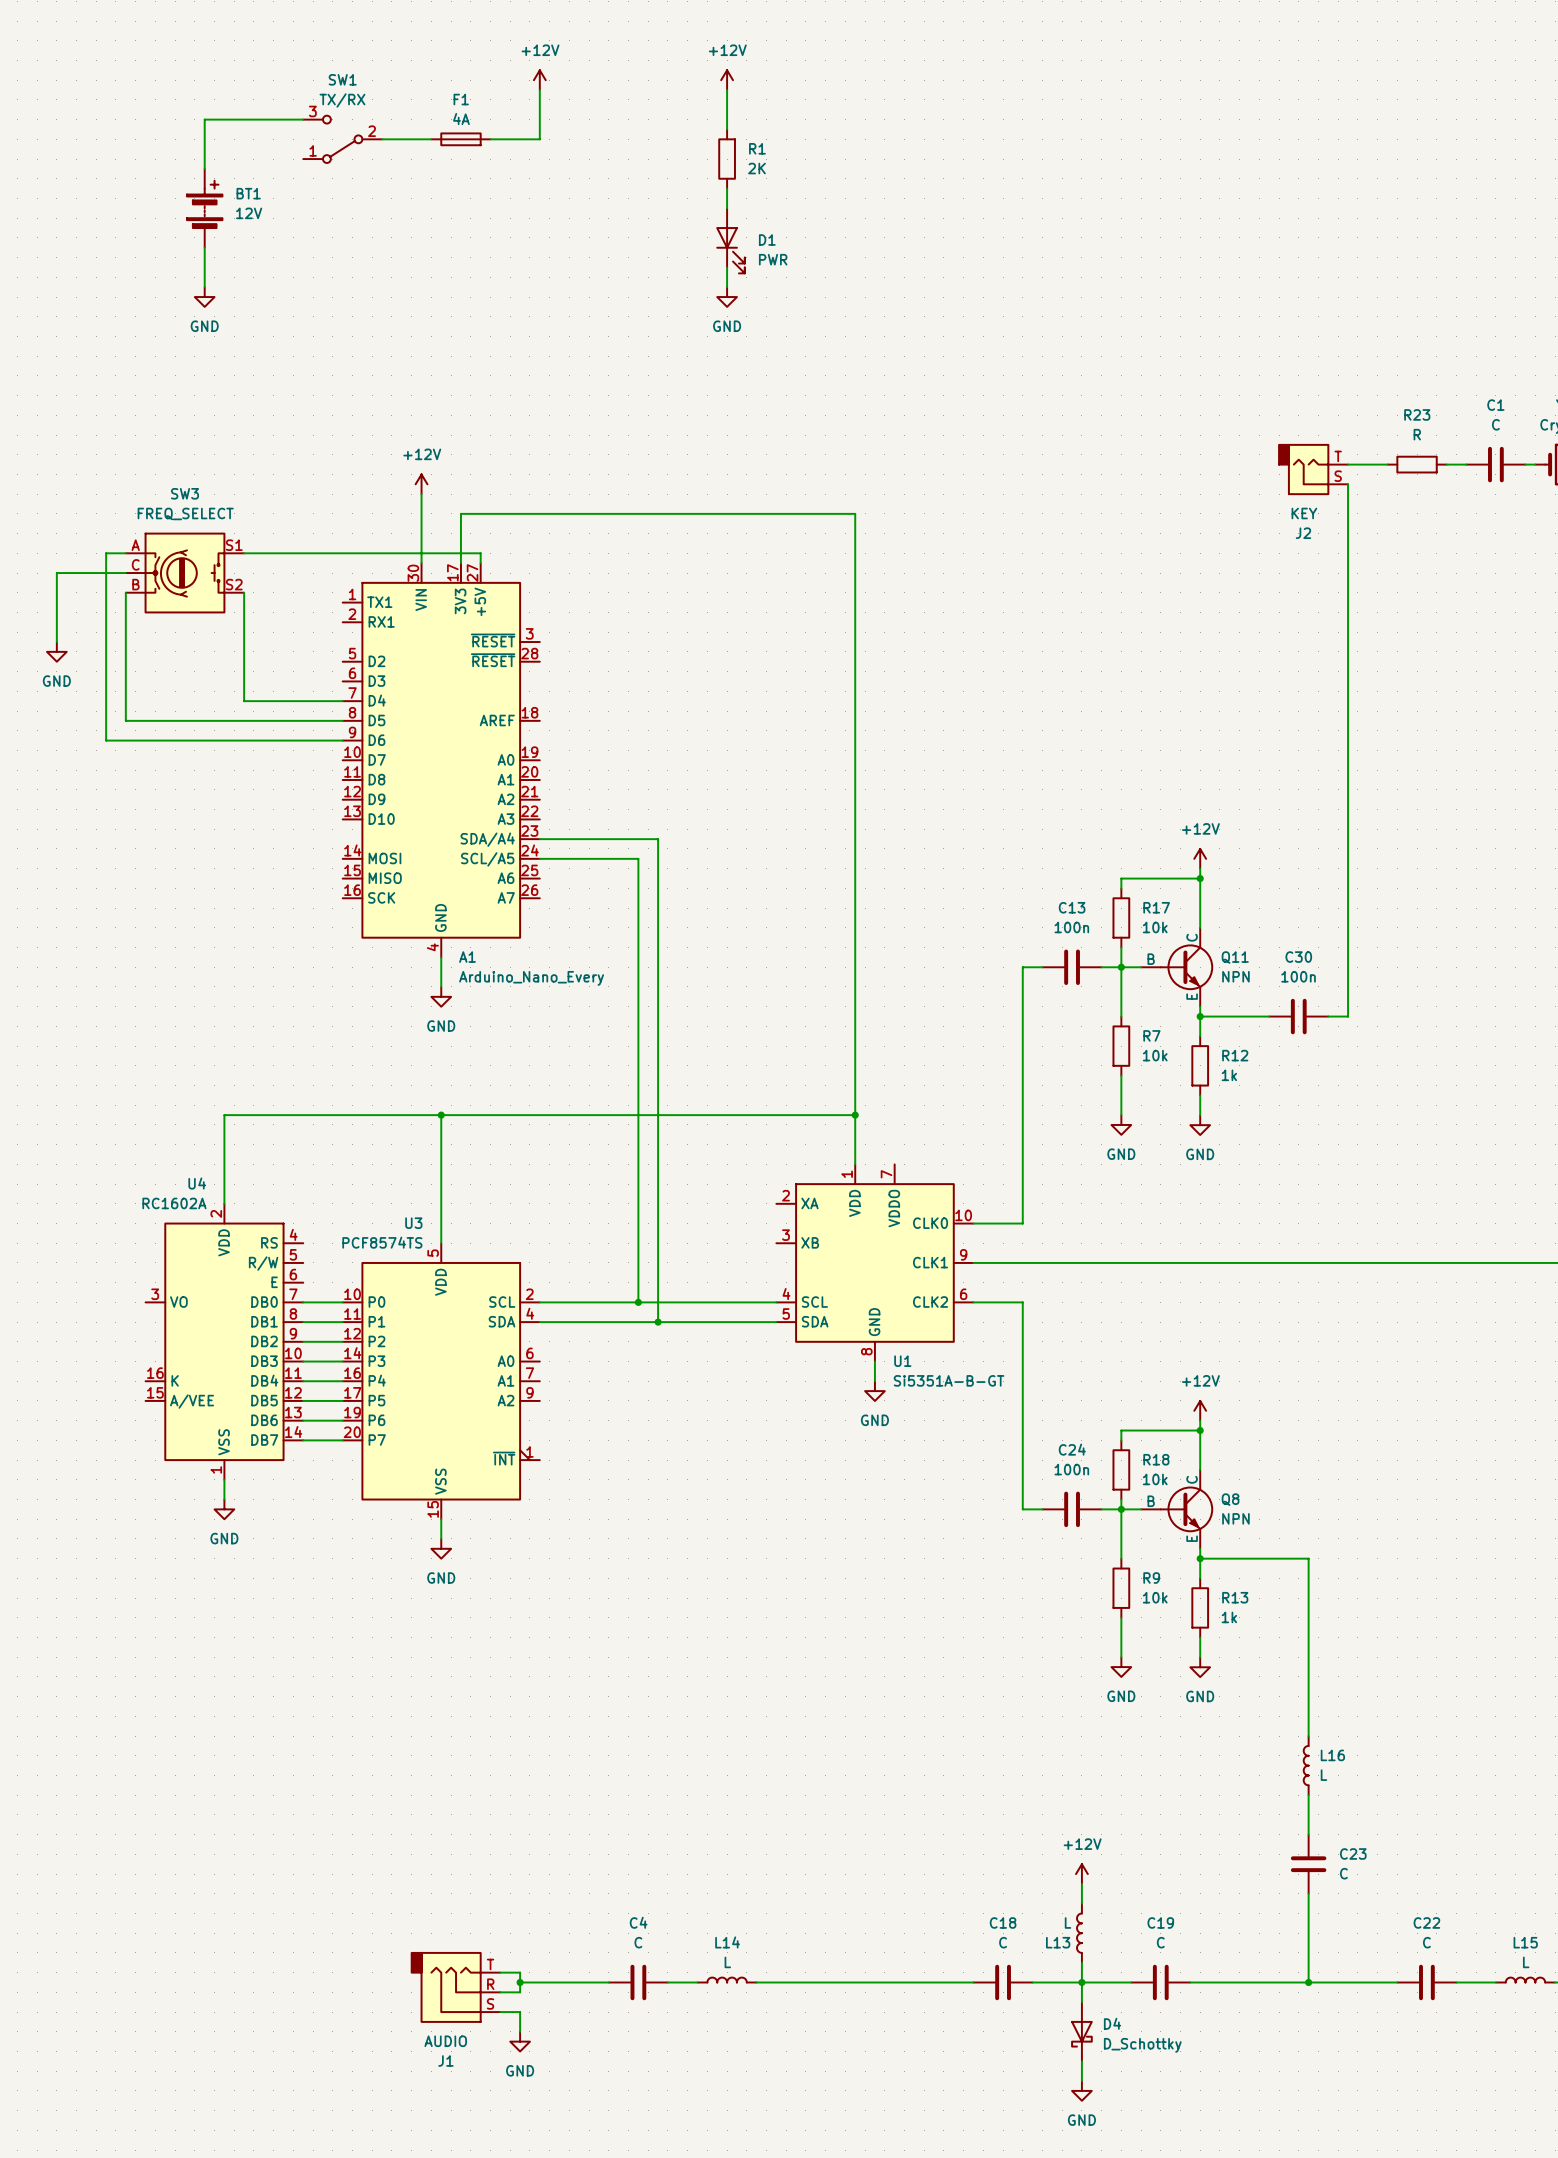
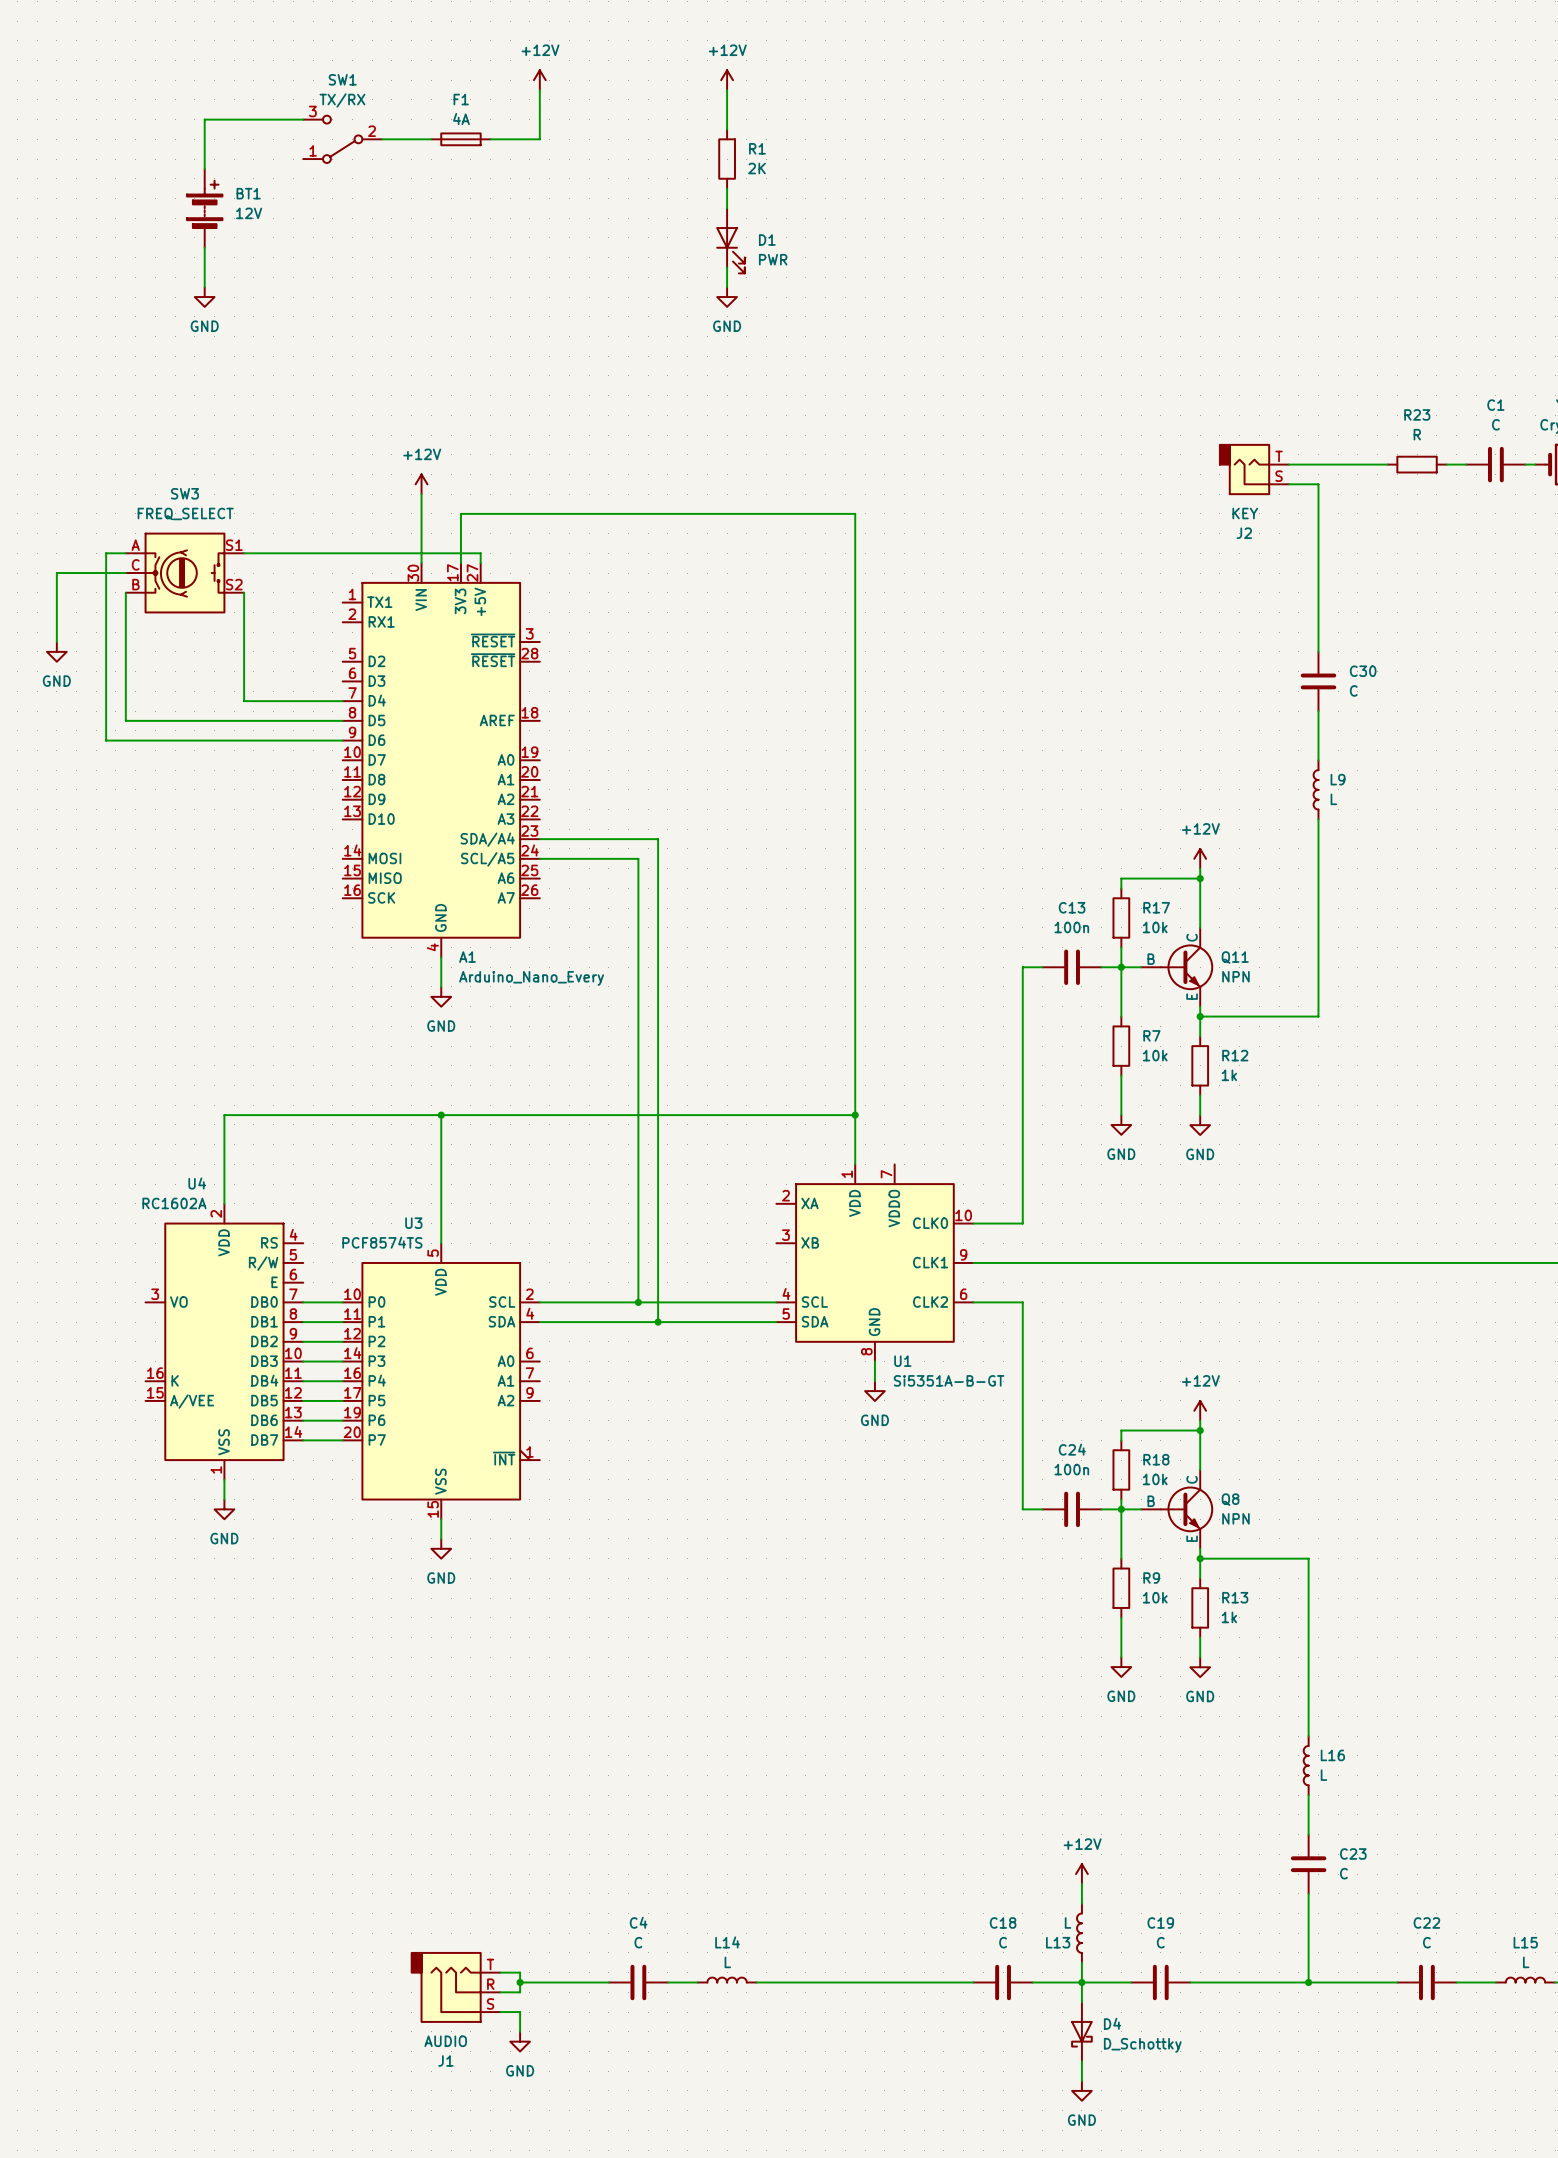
J2 position: (1313, 469) -> (1253, 469)
wire: none -> (1288, 484) (1318, 484) (1318, 651)
wire: (1348, 484) (1348, 1016) (1328, 1016) -> none
wire: none -> (1318, 711) (1318, 760)
L9: none -> L (1316, 789)
wire: none -> (1318, 819) (1318, 1016) (1269, 1016)
C30 name position: C30 (1298, 957) -> C30 (1363, 671)
C30 value: 100n (1298, 976) -> C (1353, 690)
C30 rotation: 0° (1298, 1016) -> 90° clockwise (1318, 681)
C30 position: (1298, 1016) -> (1318, 681)

